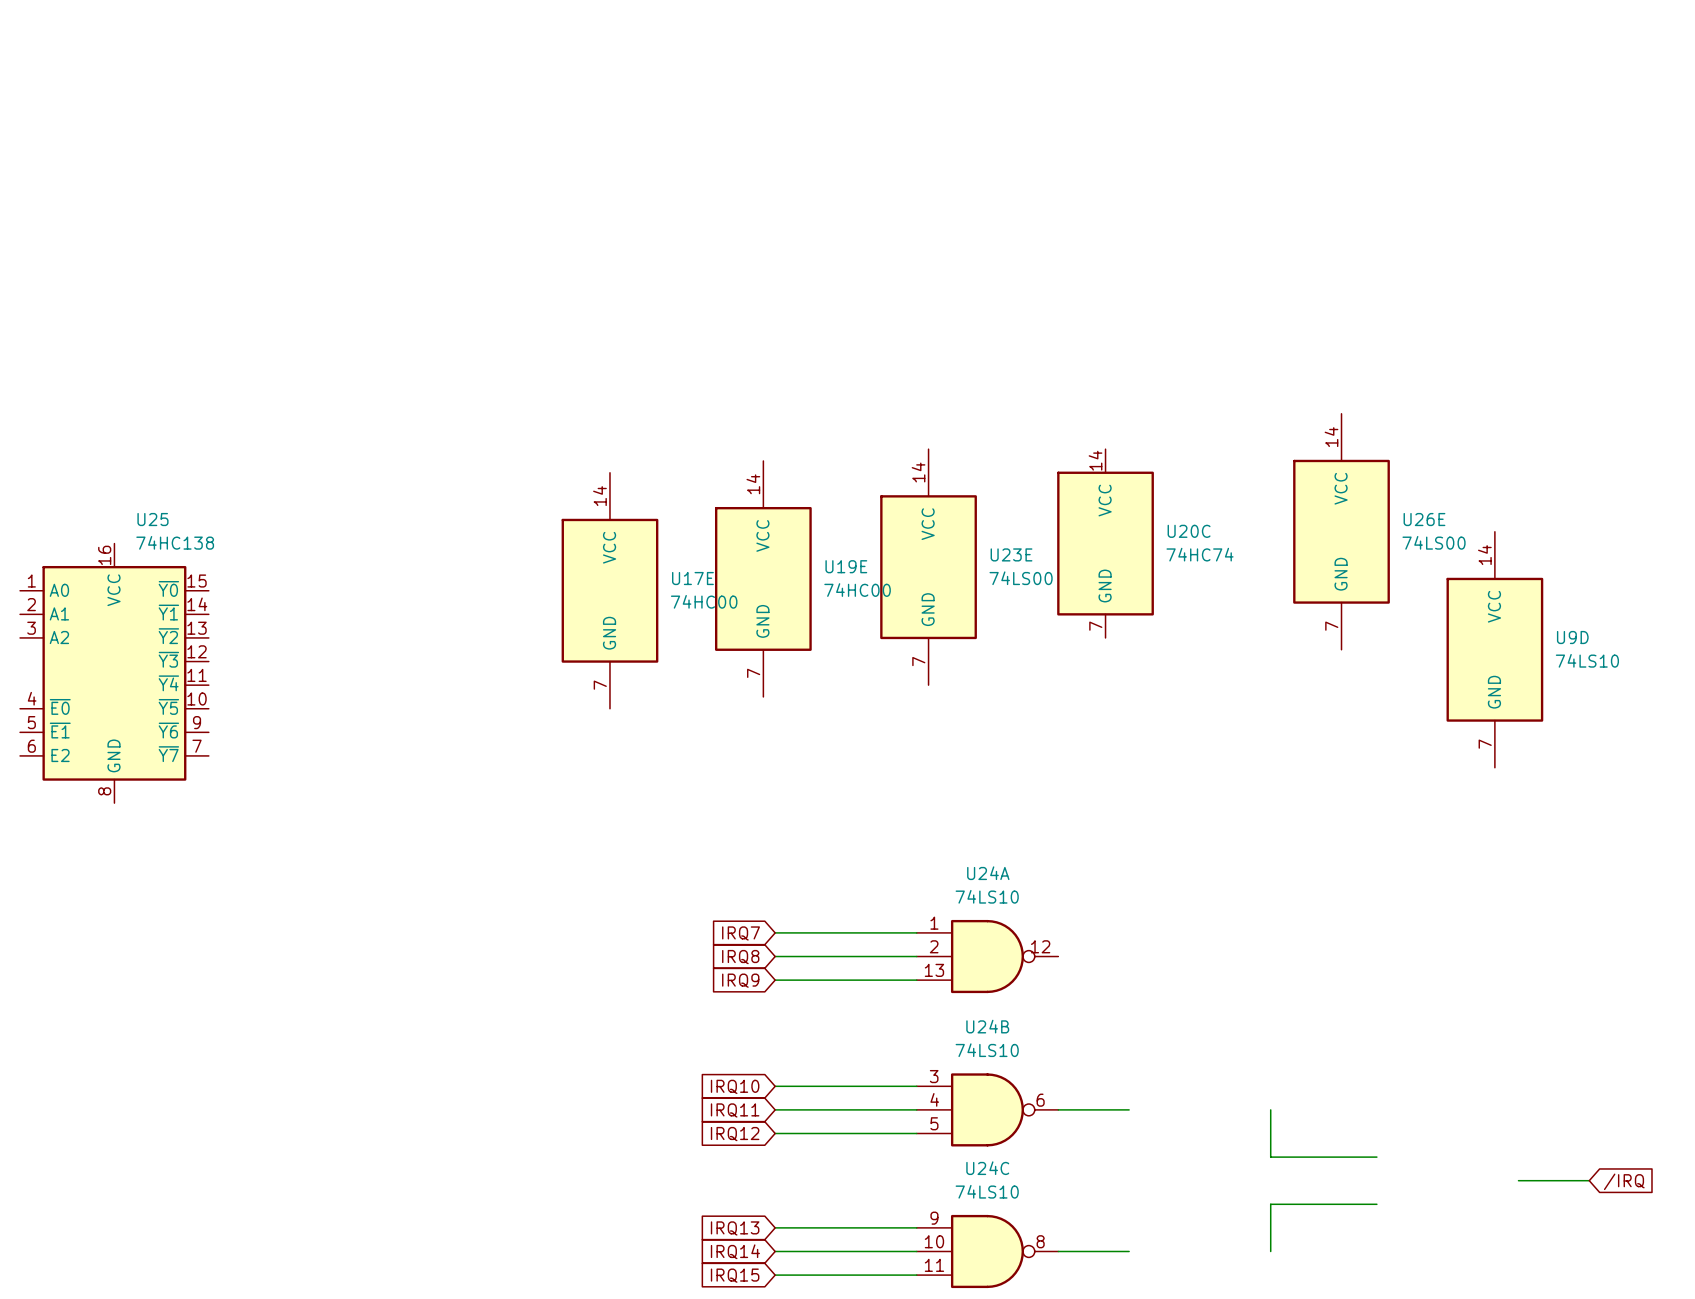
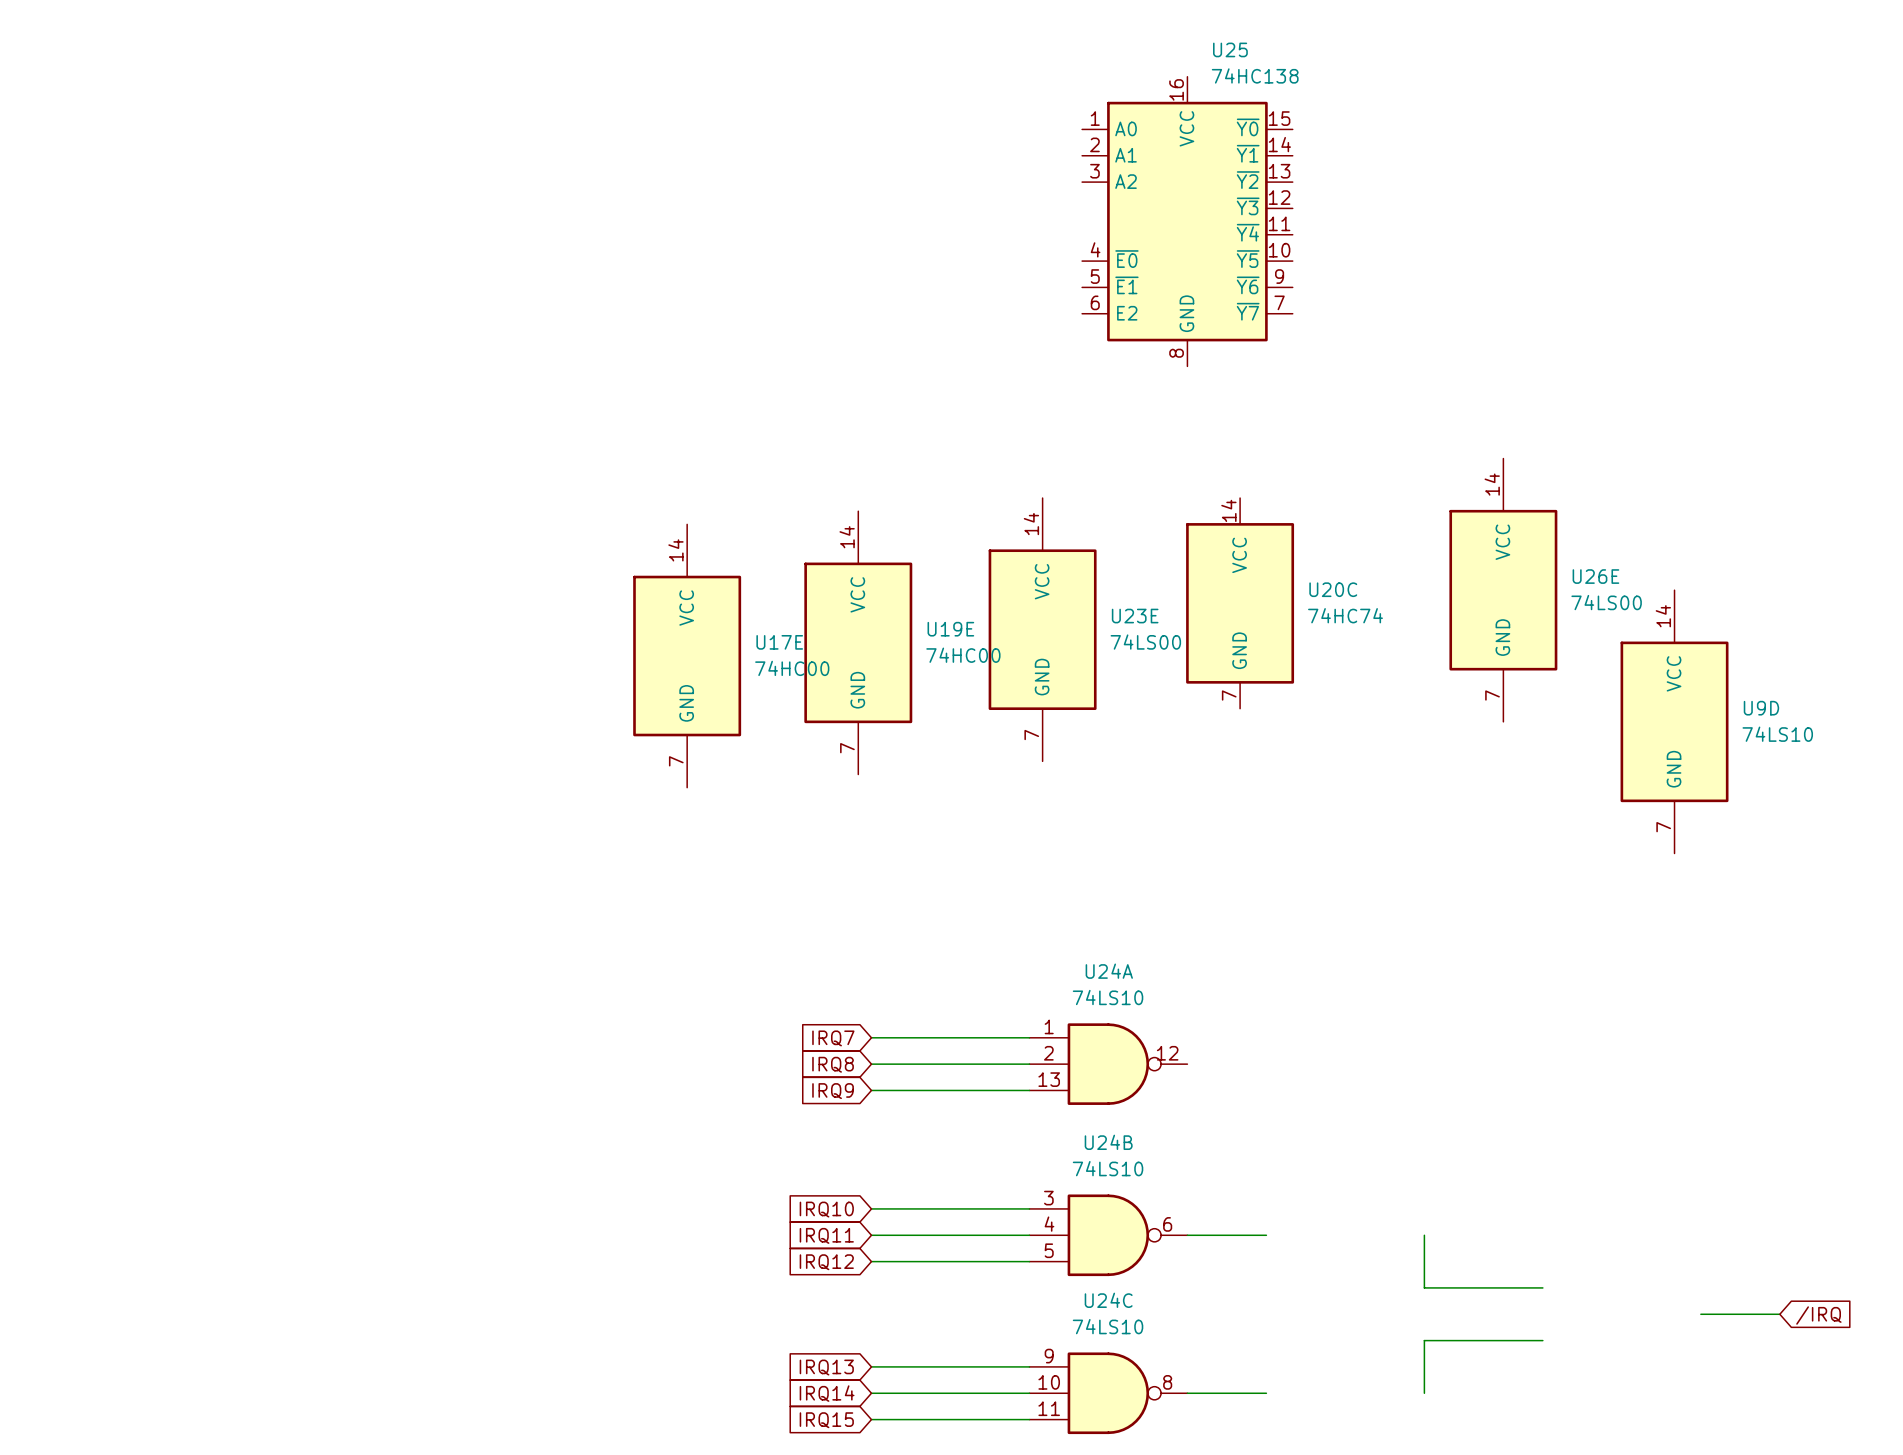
U25 position: (114, 673) -> (1187, 221)

